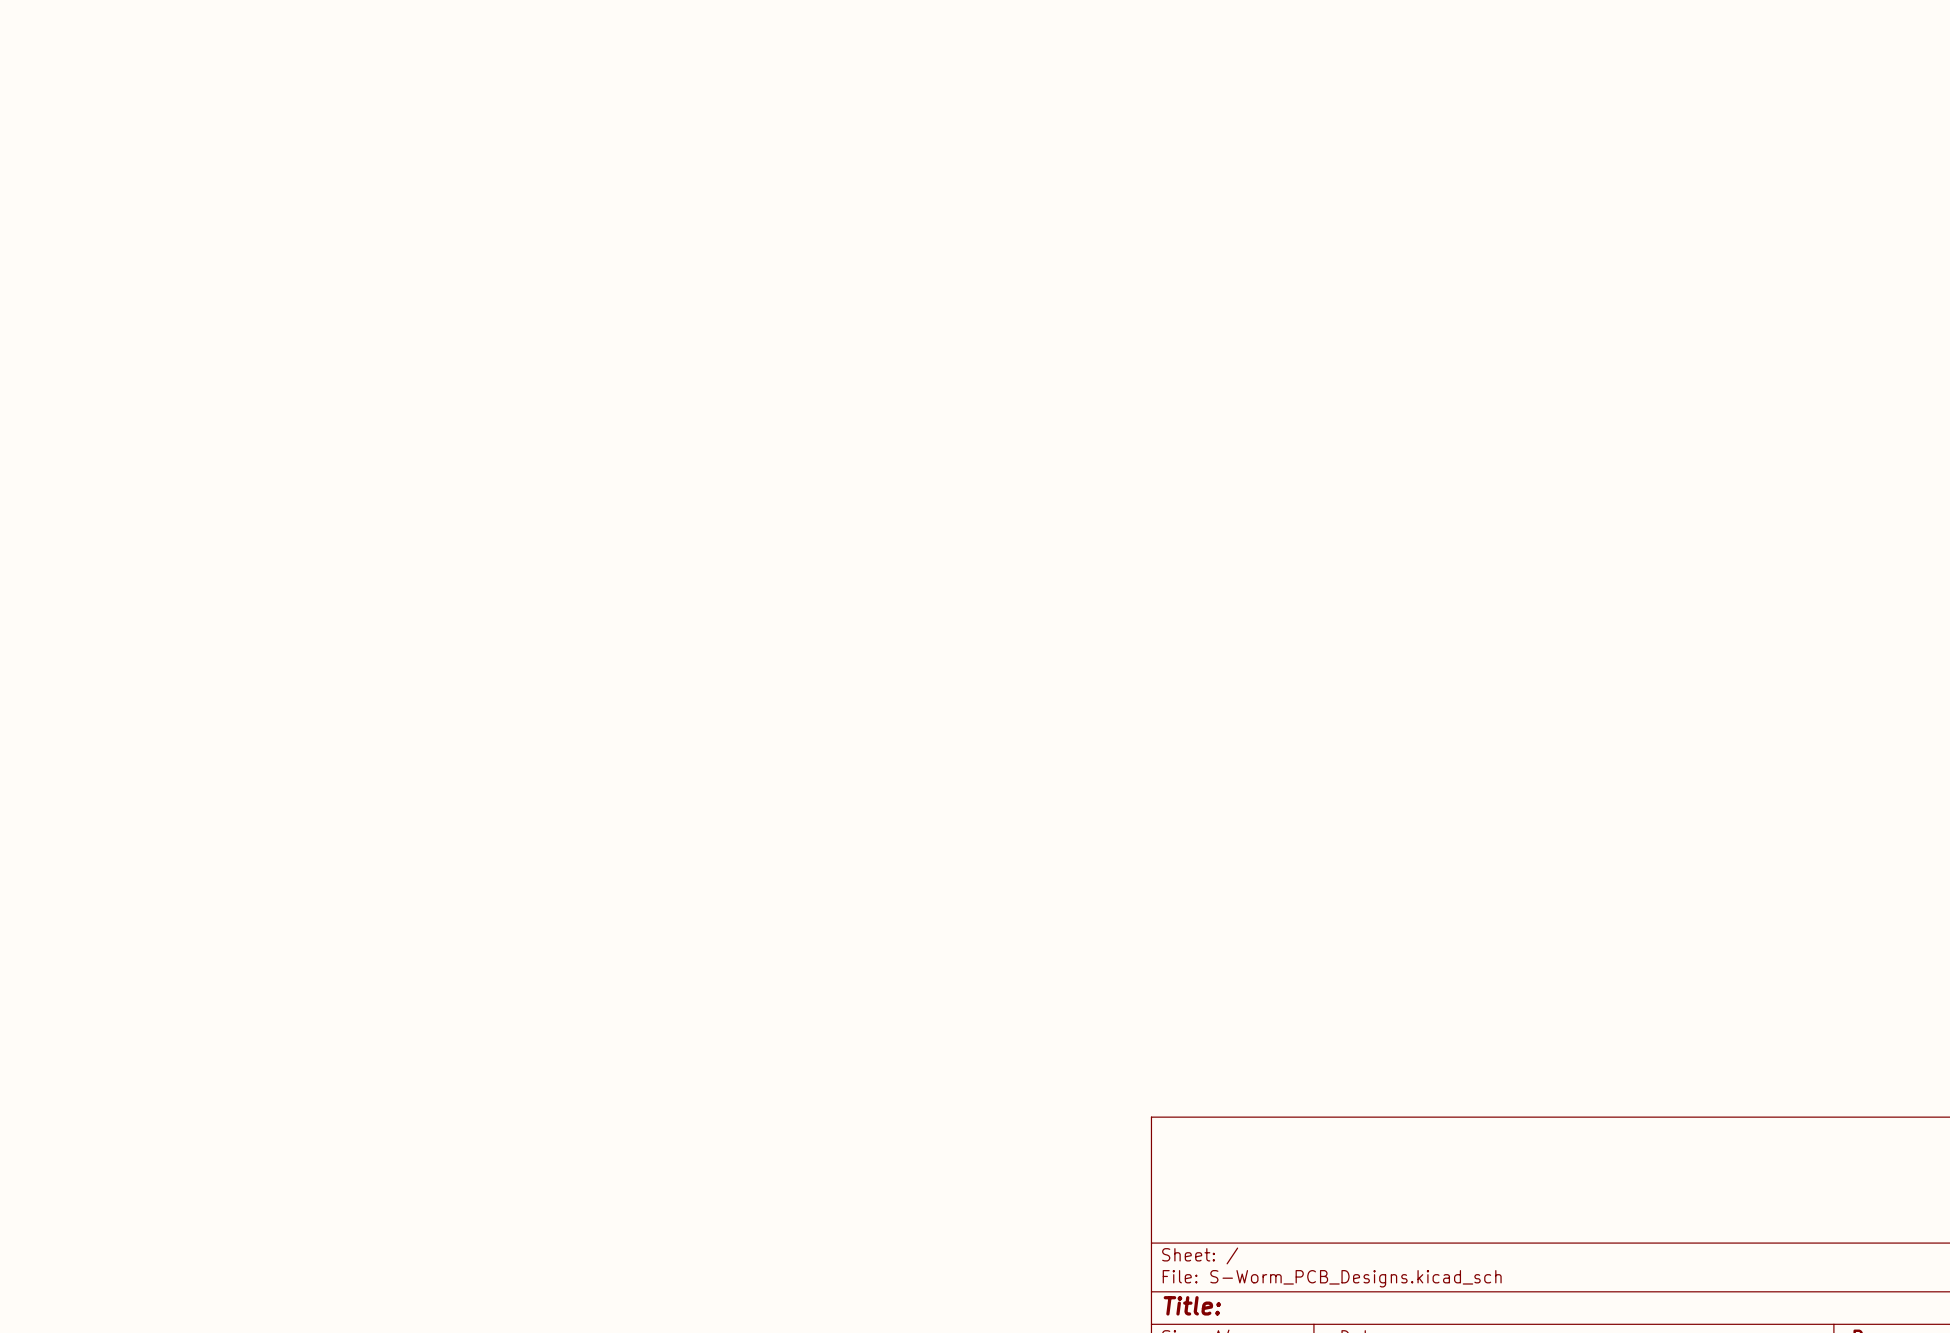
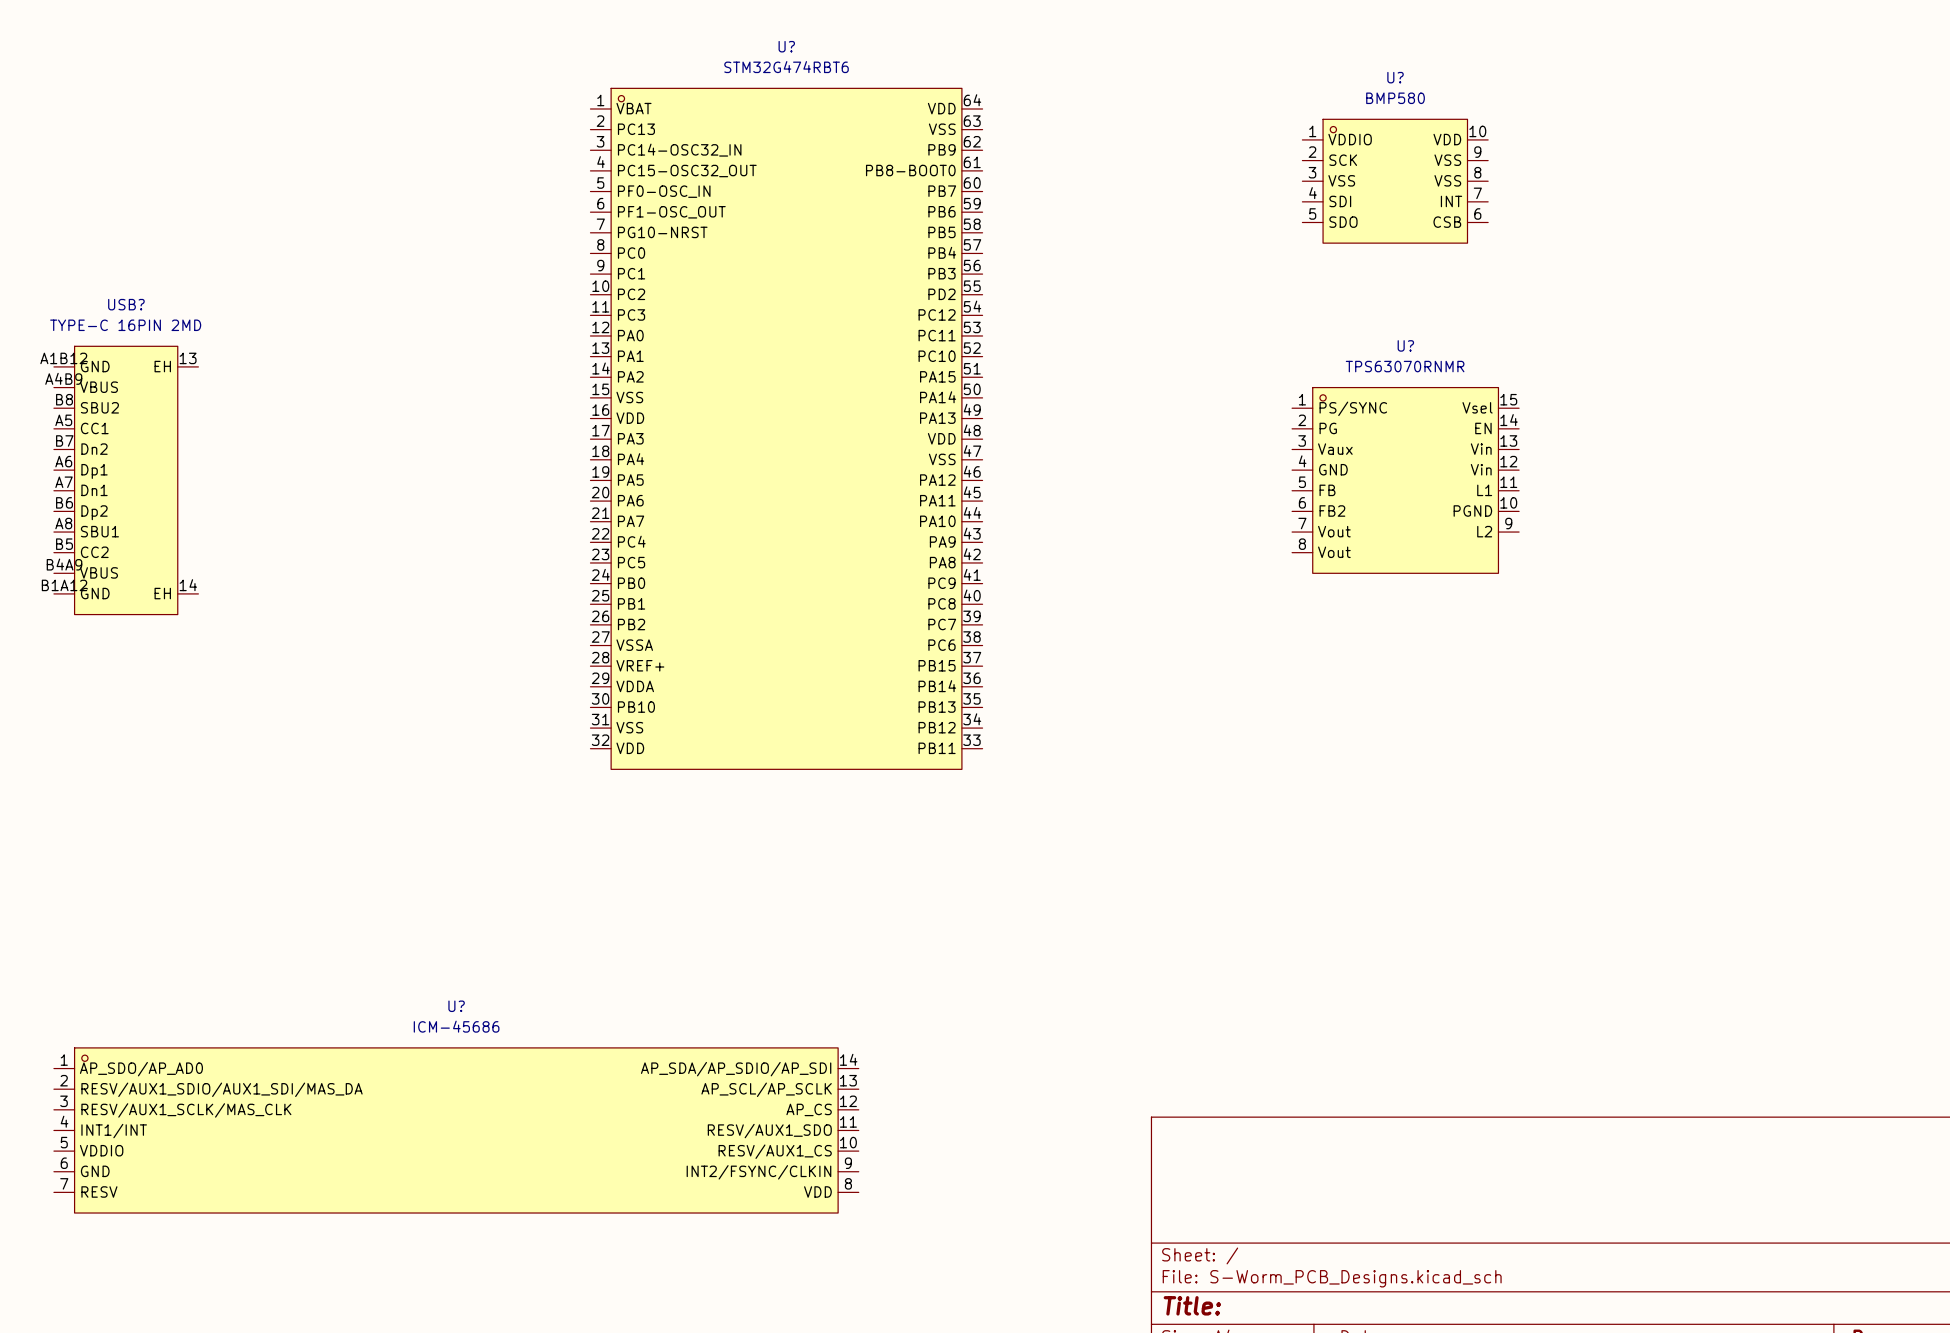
U?: none -> BMP580 (1395, 181)
U?: none -> STM32G474RBT6 (786, 428)
USB?: none -> TYPE-C 16PIN 2MD (126, 480)
U?: none -> TPS63070RNMR (1405, 480)
U?: none -> ICM-45686 (456, 1130)

